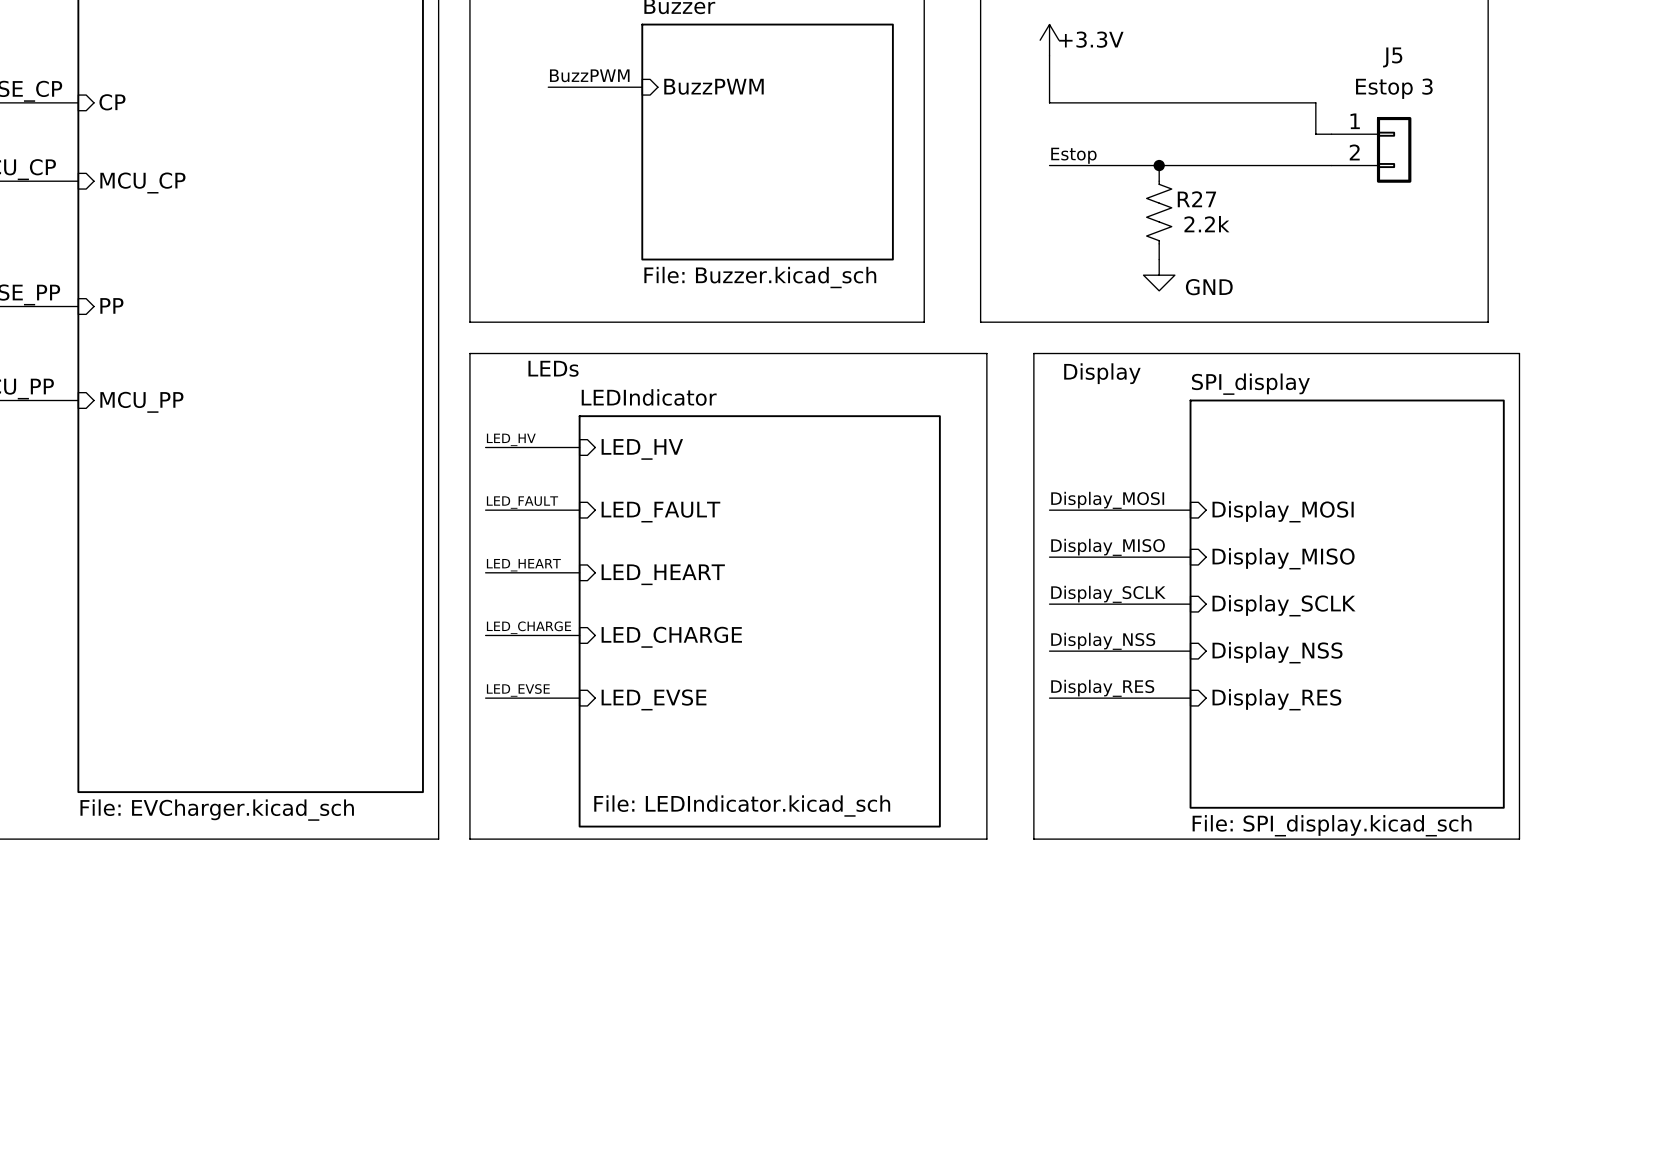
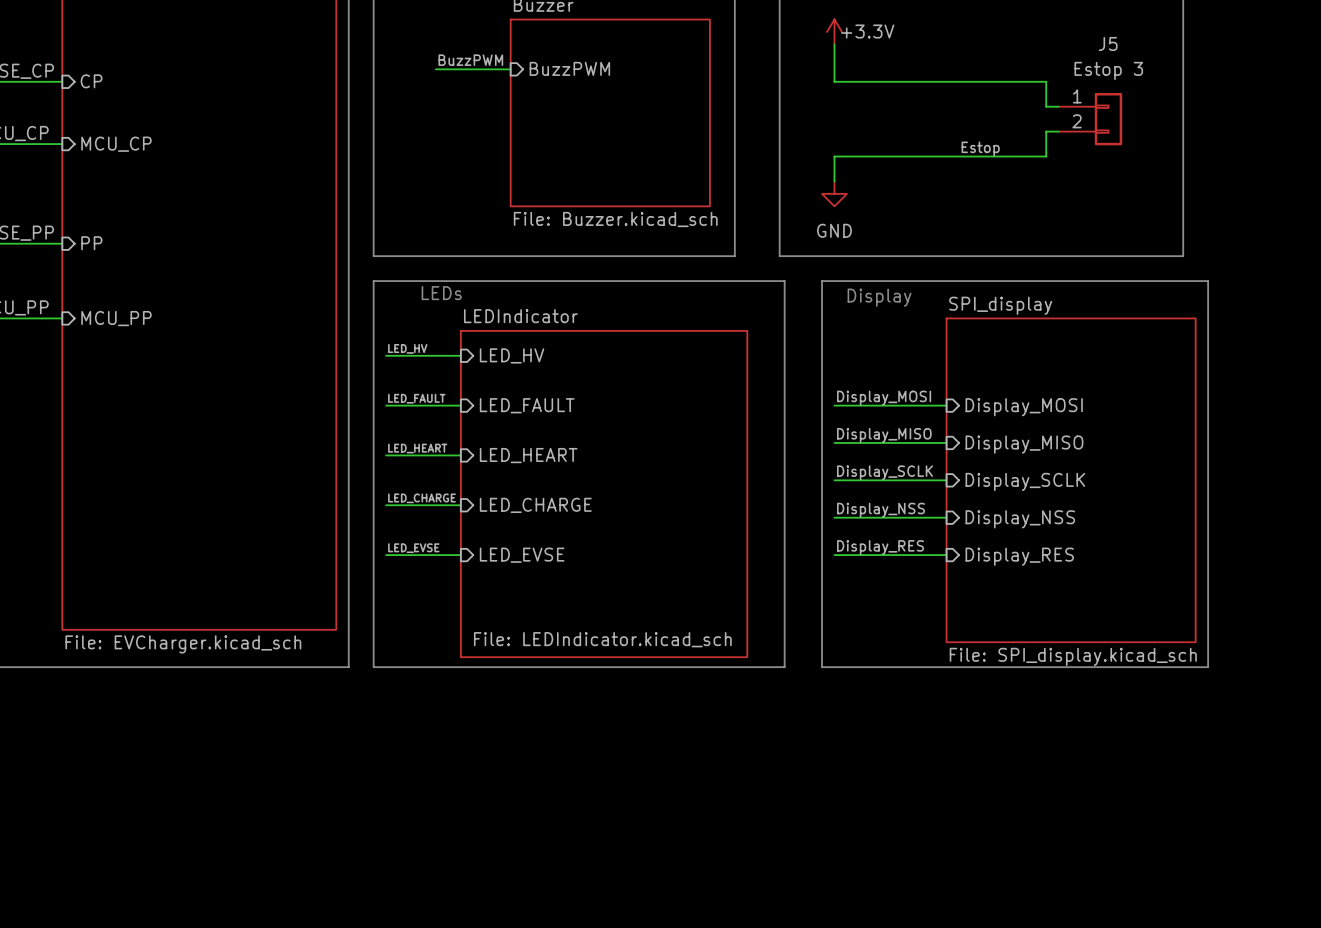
label position: Estop (1073, 155) -> Estop (980, 148)
wire: (1049, 165) (1315, 165) -> (834, 181) (834, 156) (1046, 156) (1046, 131)
junction: (1159, 165) -> none
R27: 2.2k (1159, 212) -> none
power symbol position: GND (1159, 275) -> GND (834, 193)
power symbol text position: GND (1209, 287) -> GND (834, 230)

